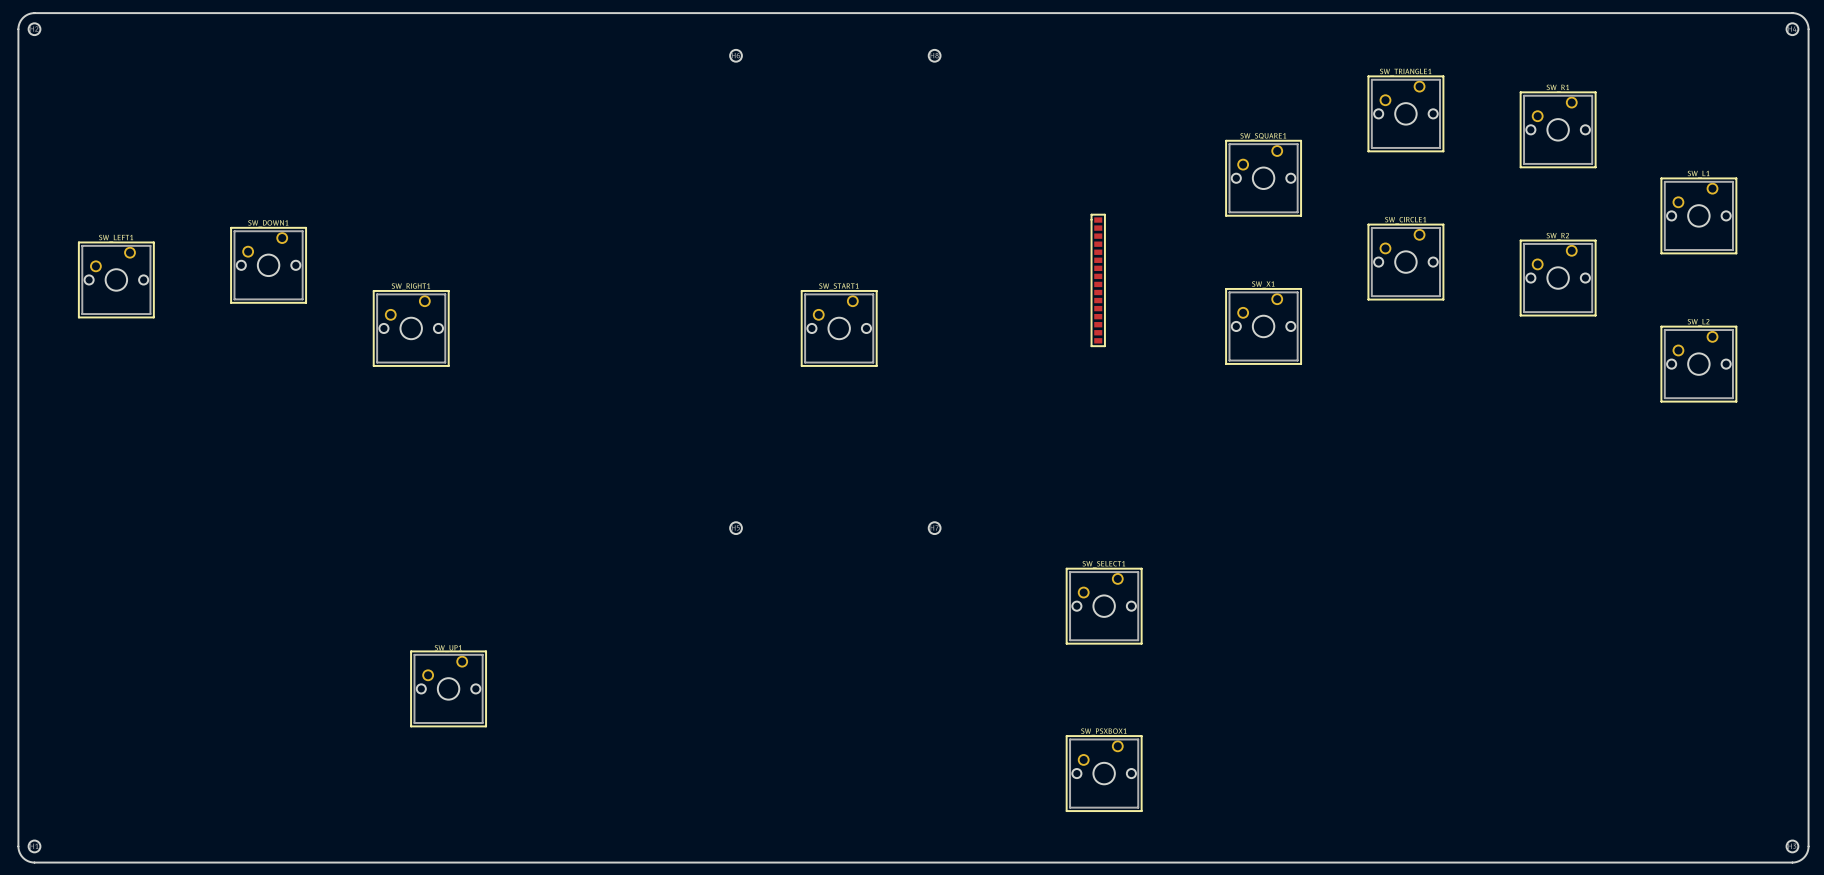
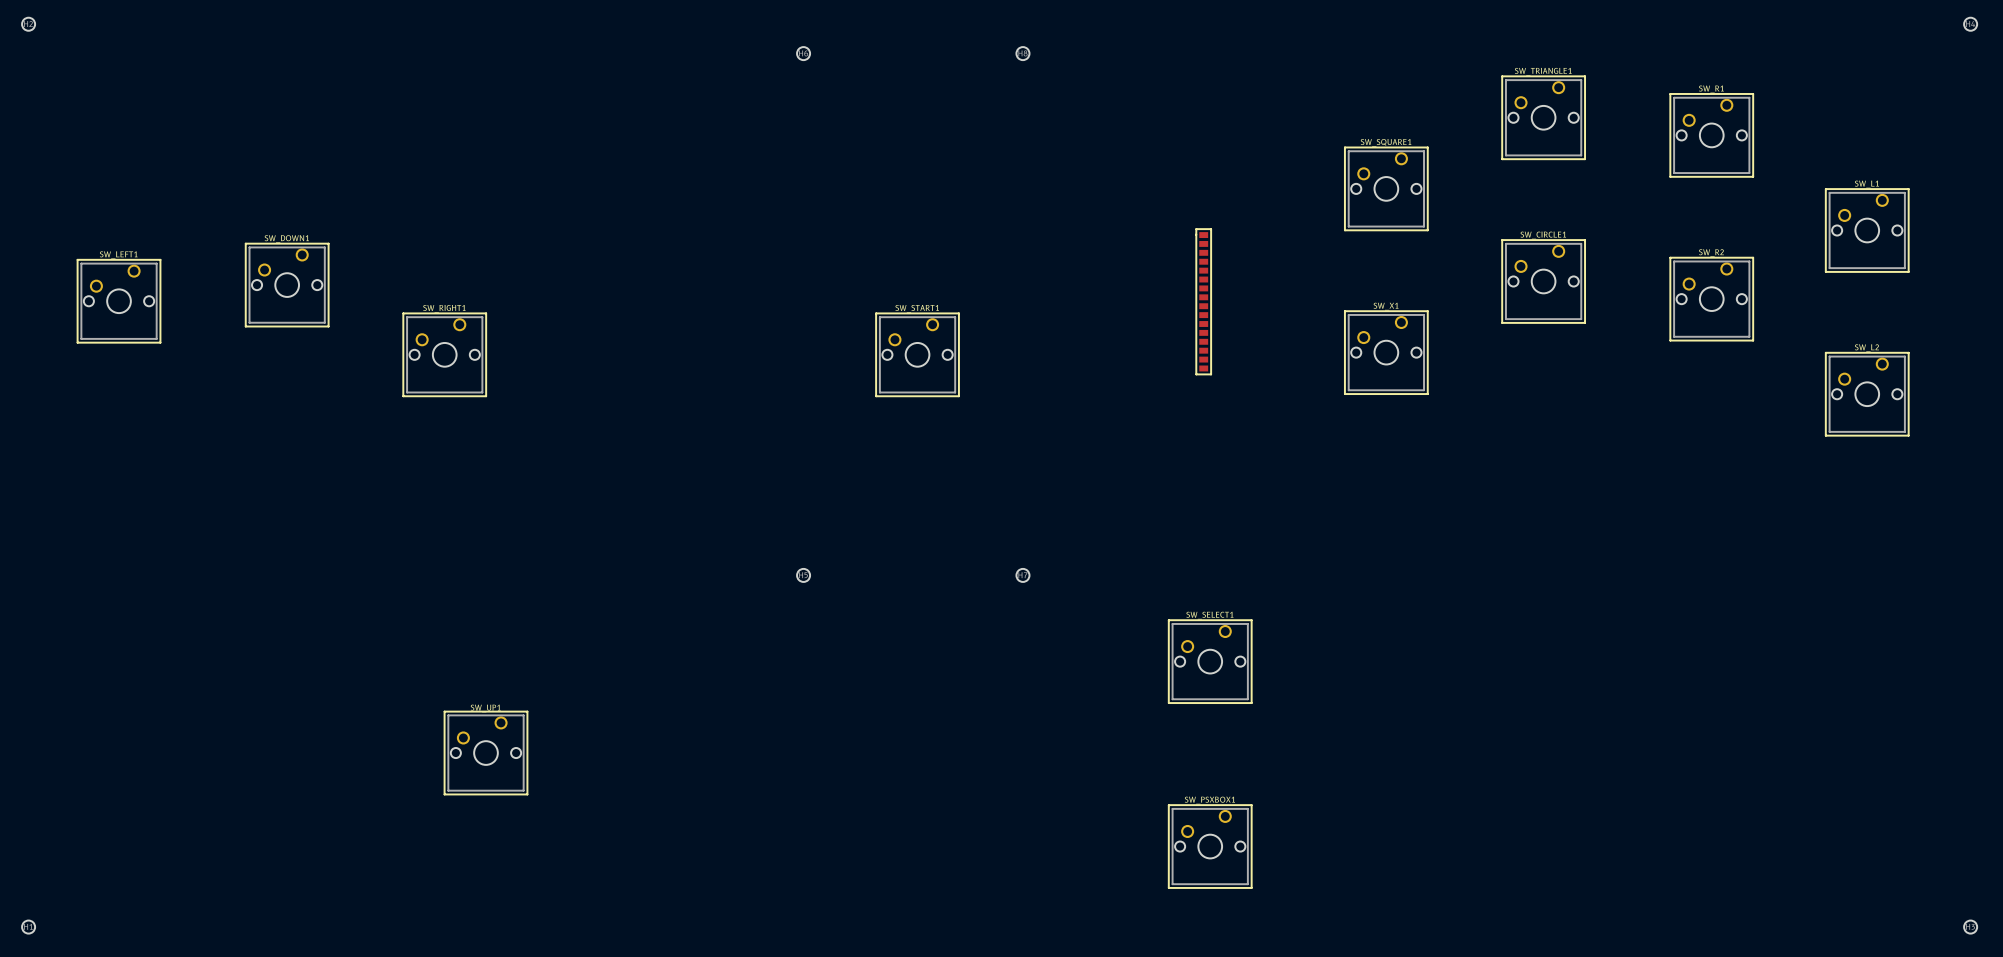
board edge: (34, 13) (1798, 14) (1805, 19) (1808, 29) (1807, 852) (1802, 859) (1792, 862) (28, 861) (21, 856) (18, 846) (18, 29) (23, 17) (34, 13) -> none

